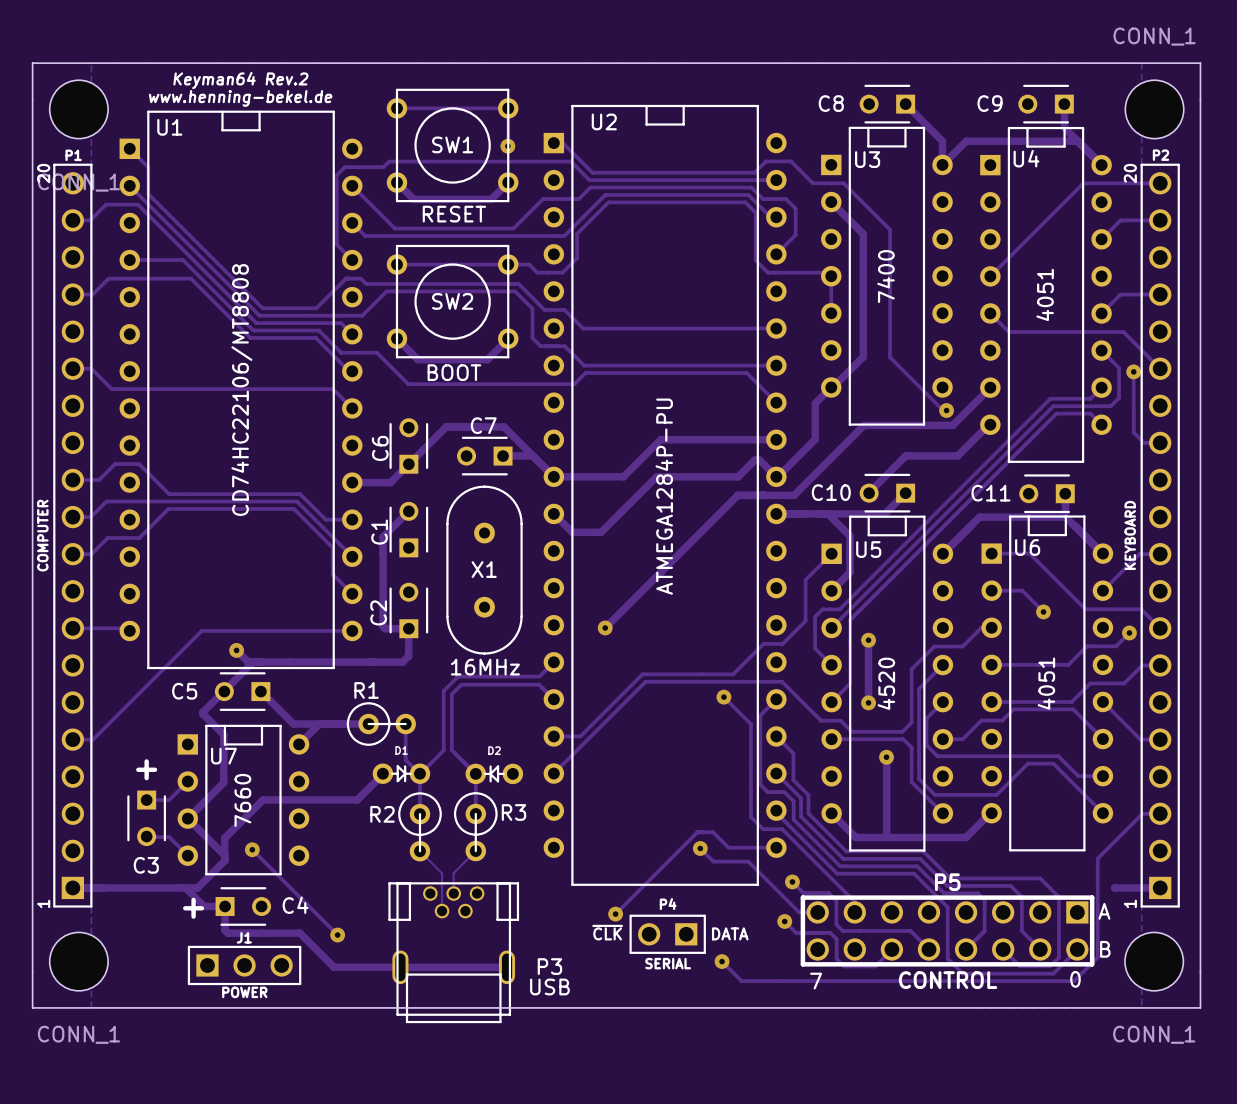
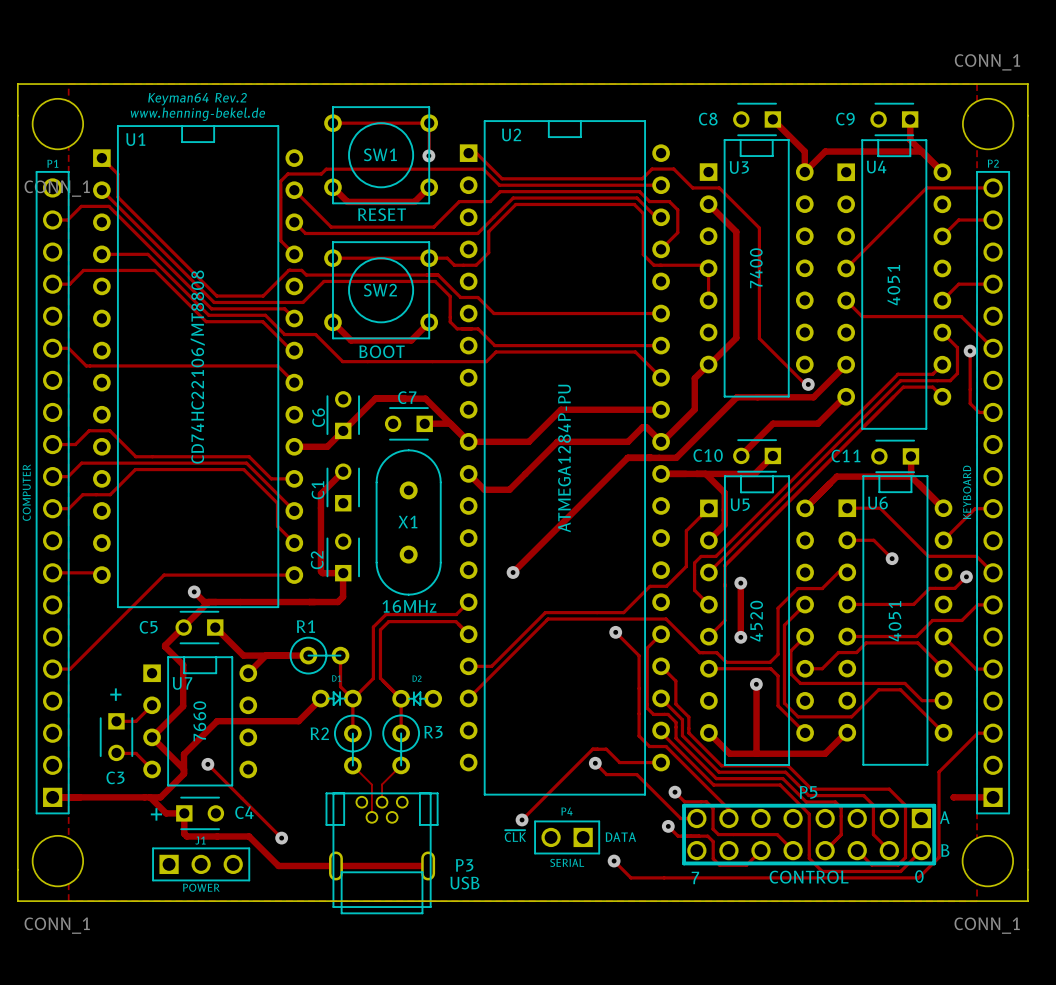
text: 20 (43, 173) -> none
text: 20 (1130, 173) -> none
text: 1 (43, 903) -> none
text: 1 (1130, 903) -> none

